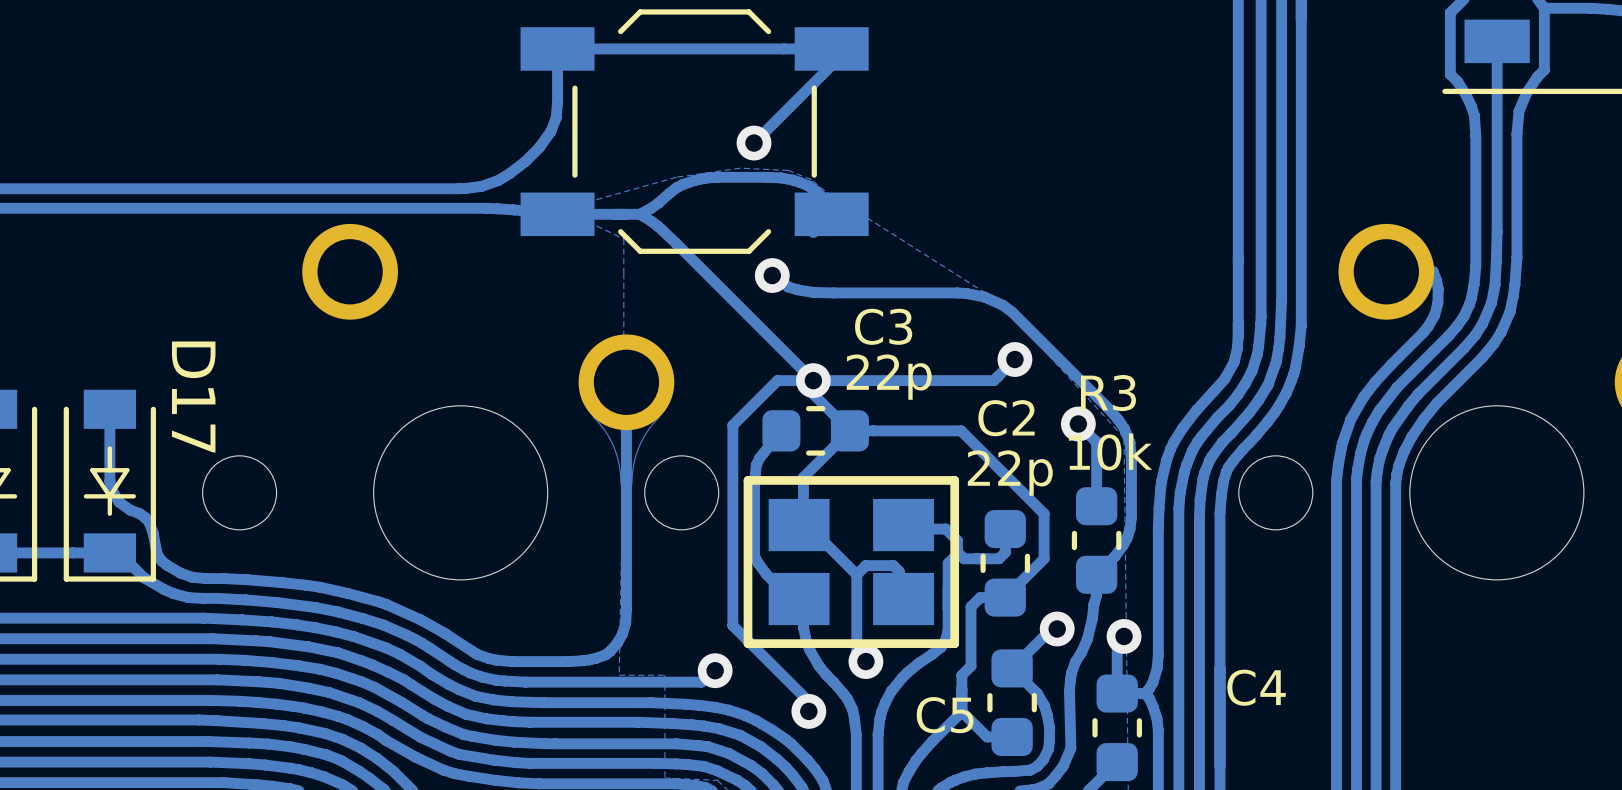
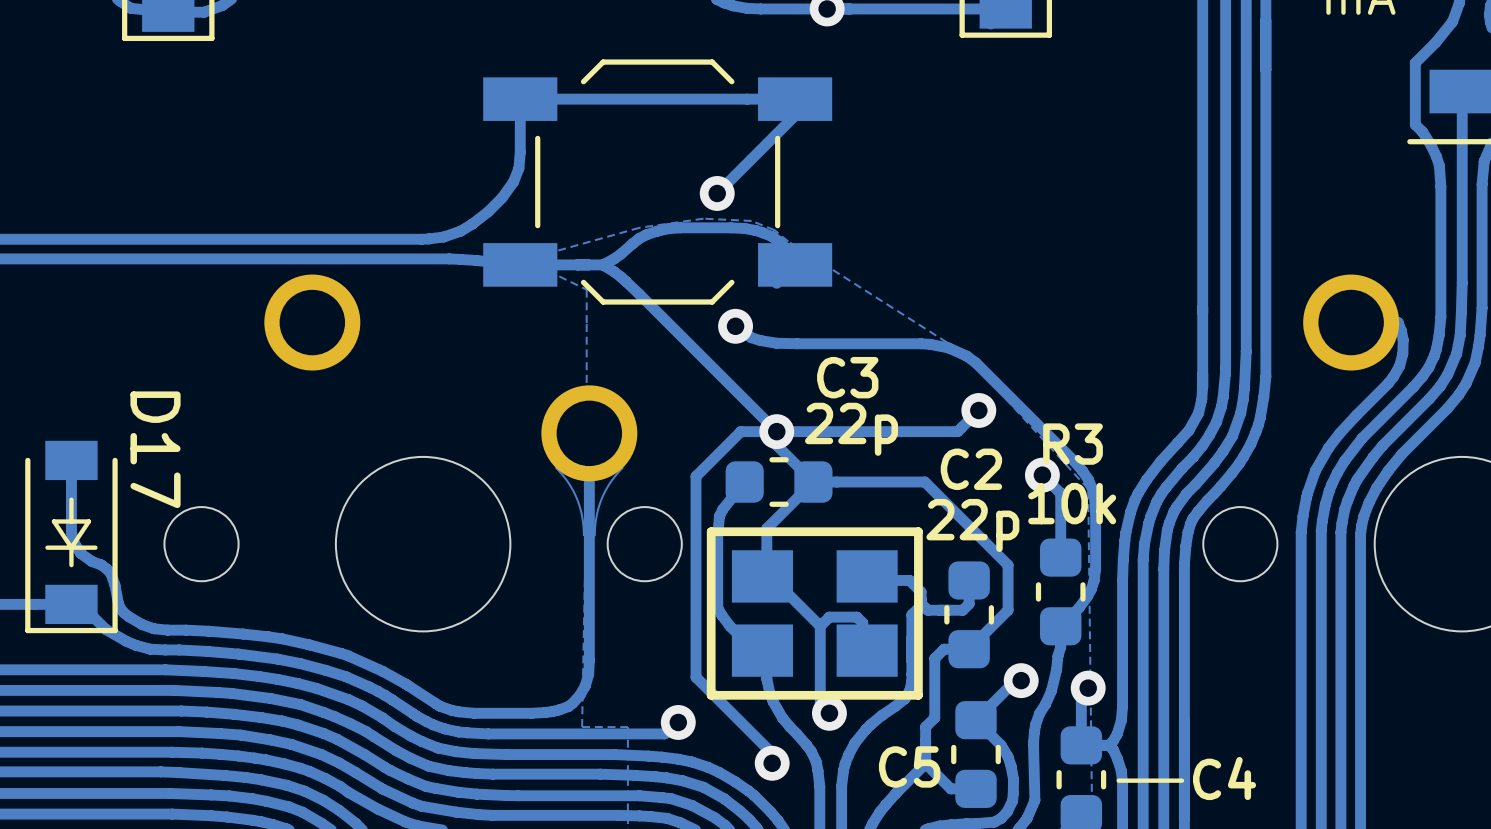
C4 name position: C4 (1256, 687) -> C4 (1224, 778)
line: none -> (1181, 780) (1118, 780)

